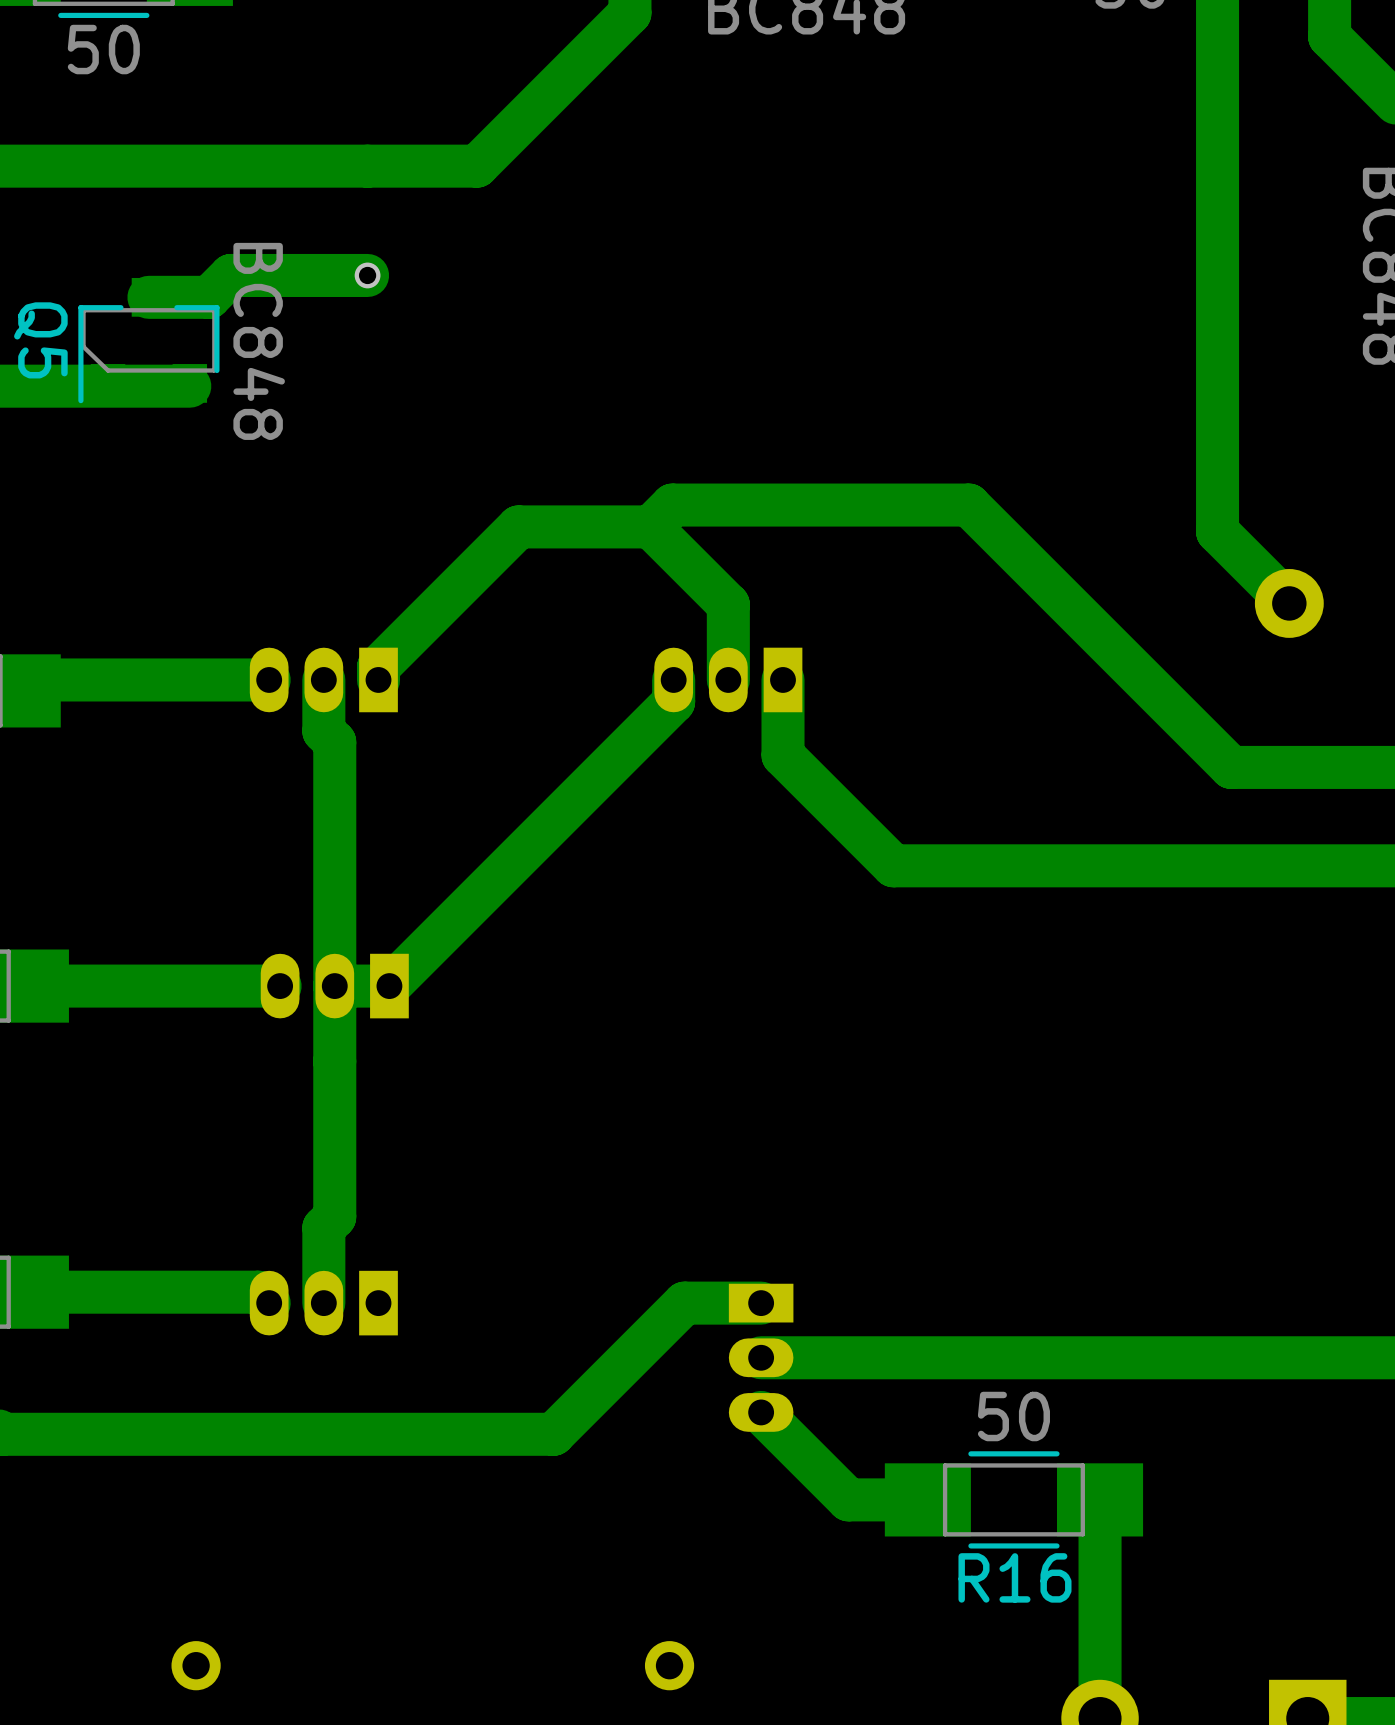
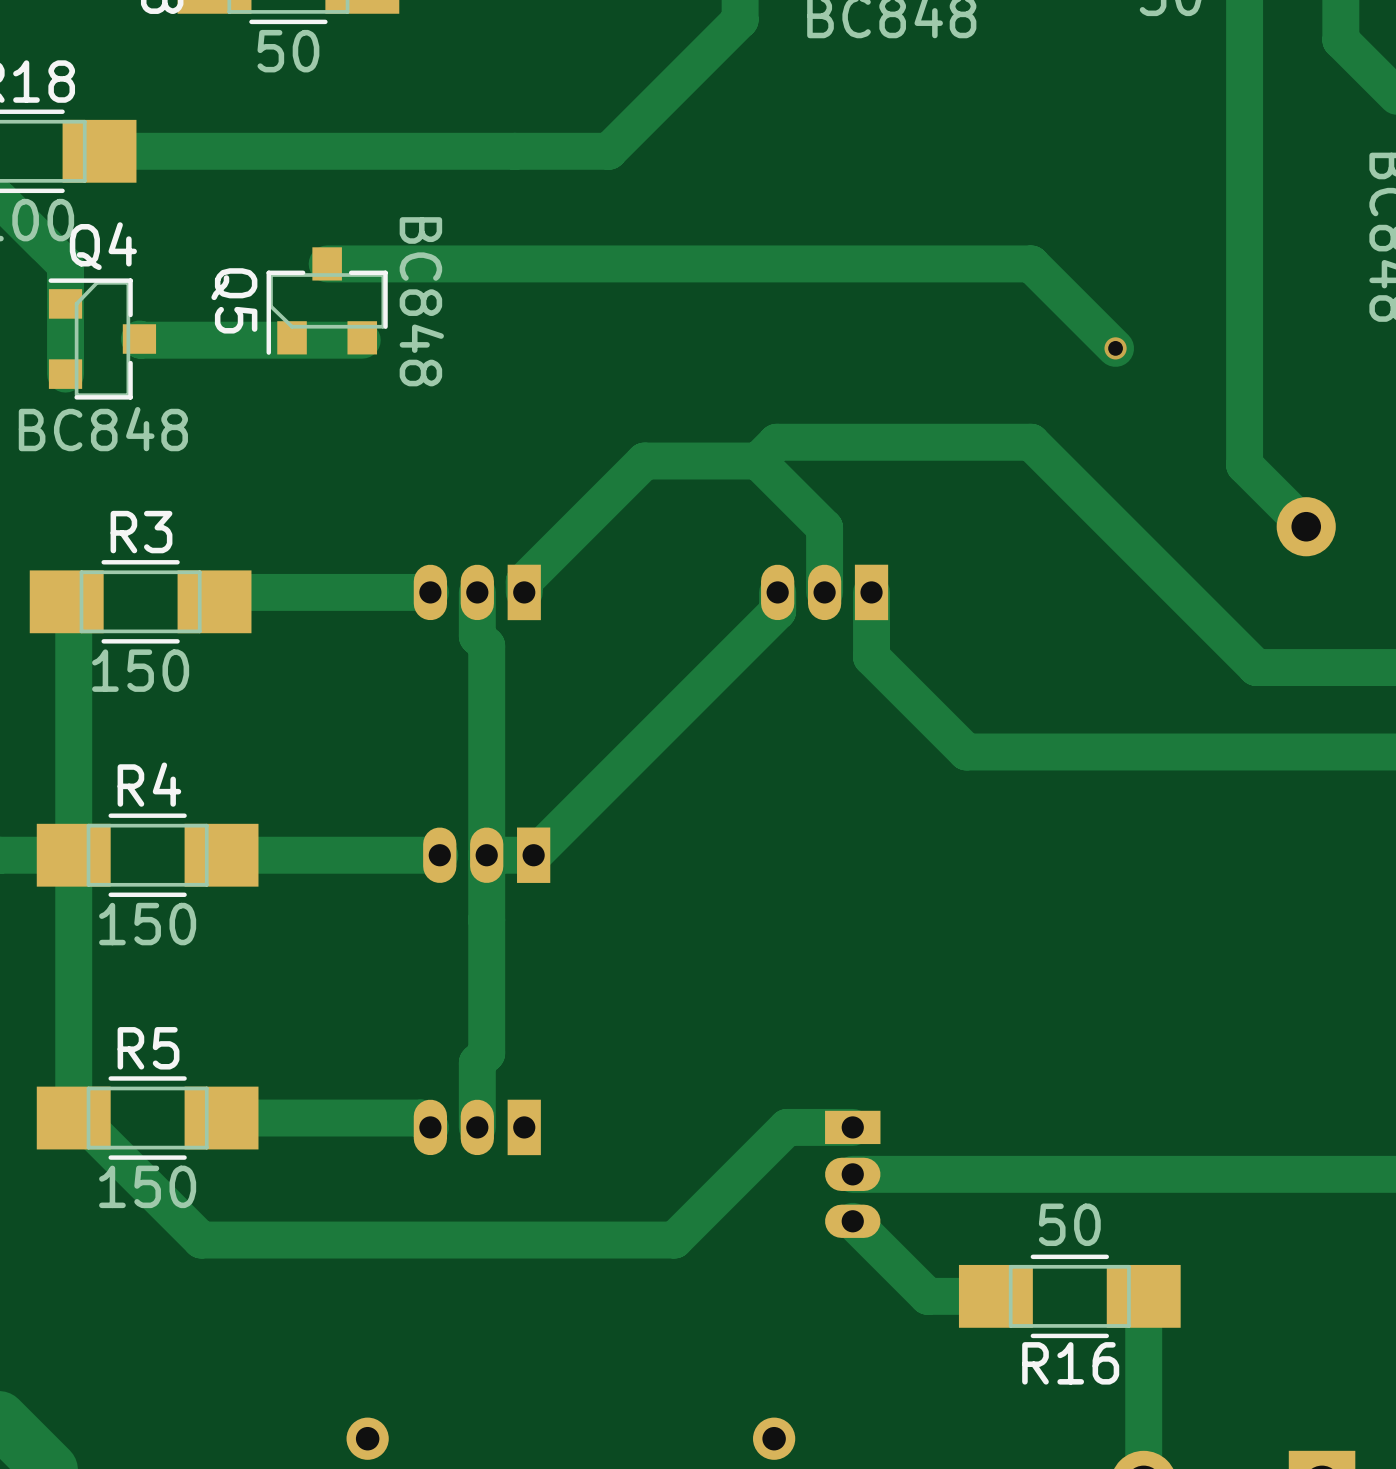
track: (367, 275) (231, 275) (209, 297) -> (1115, 348) (1031, 263) (378, 263)
via: (367, 275) -> none
via: none -> (1115, 348)

